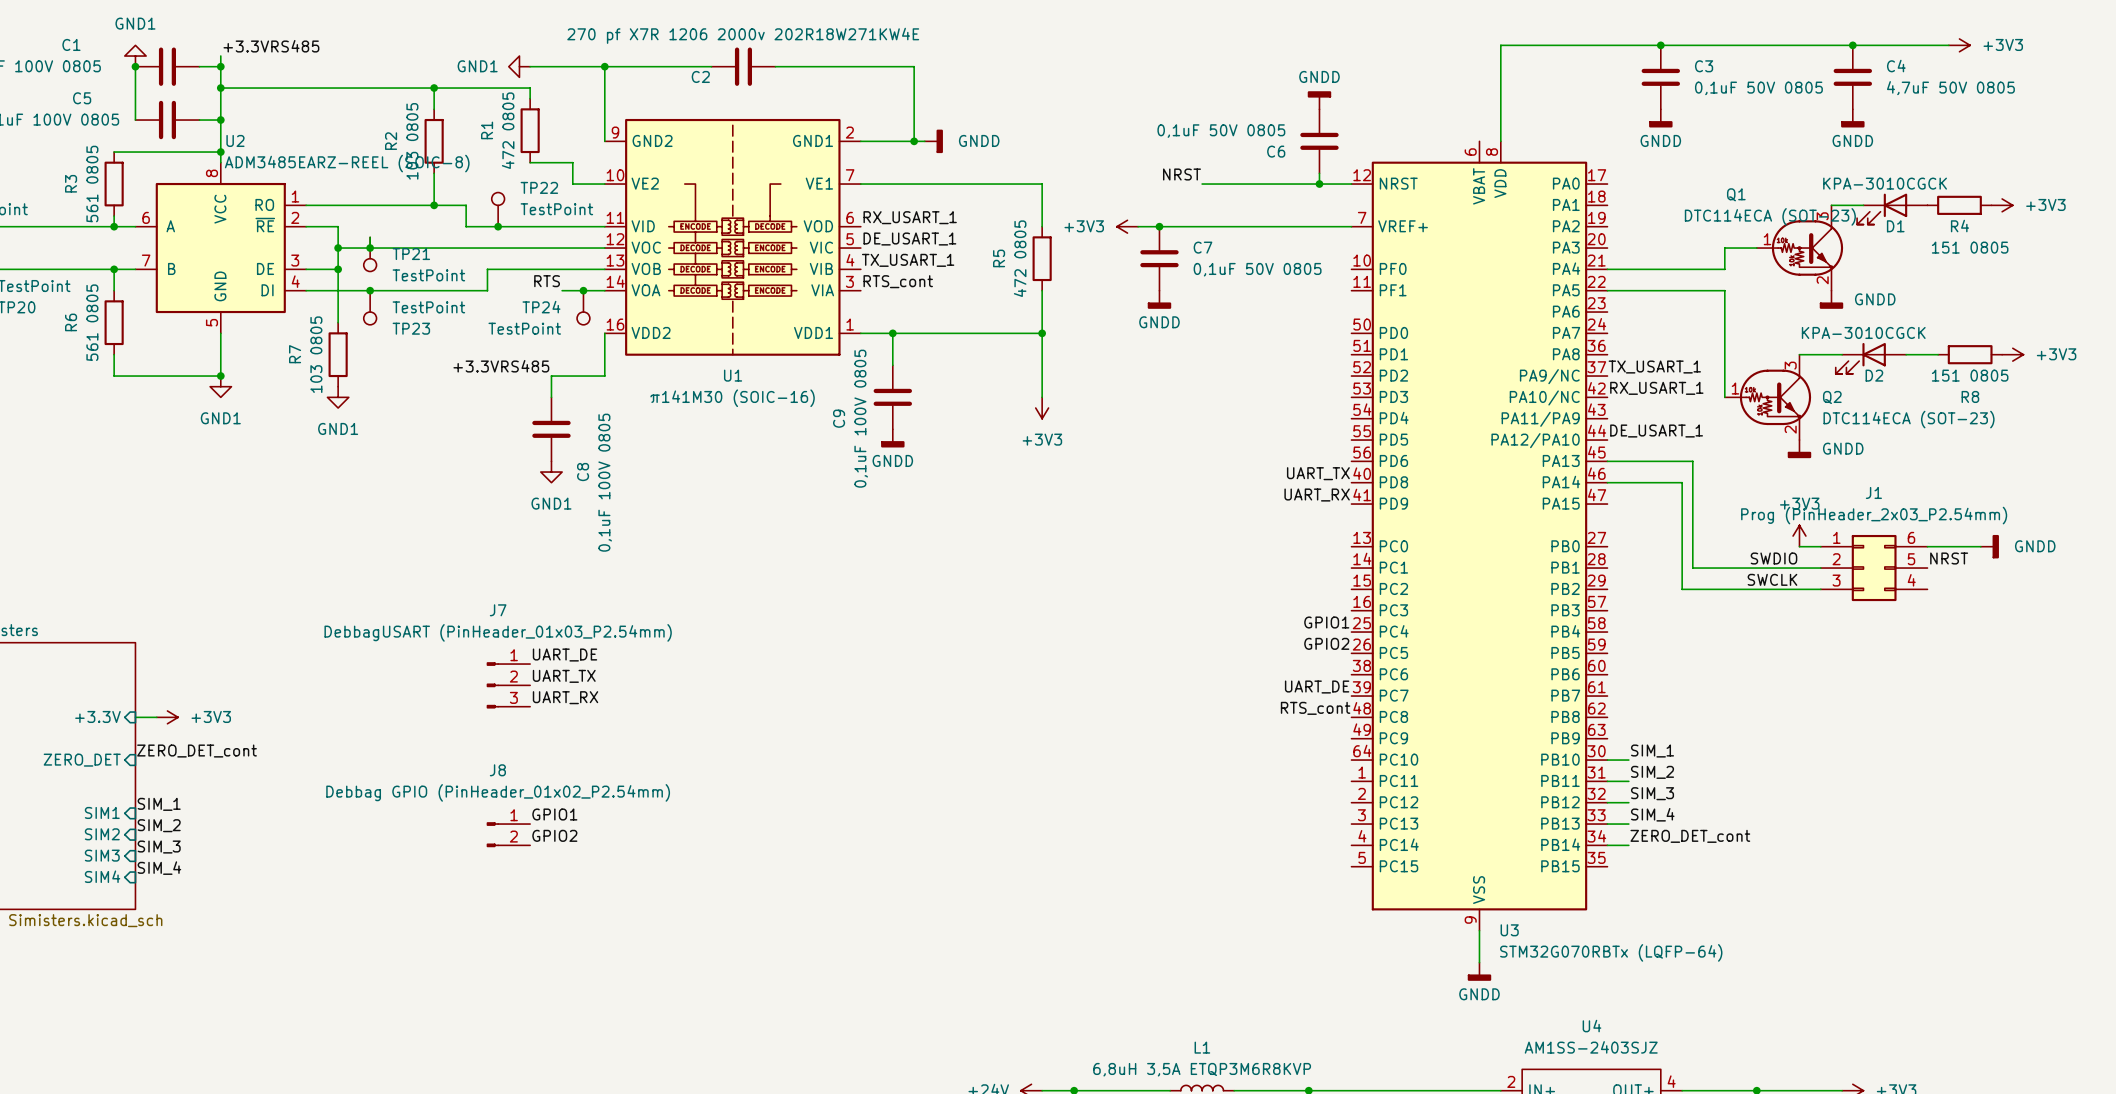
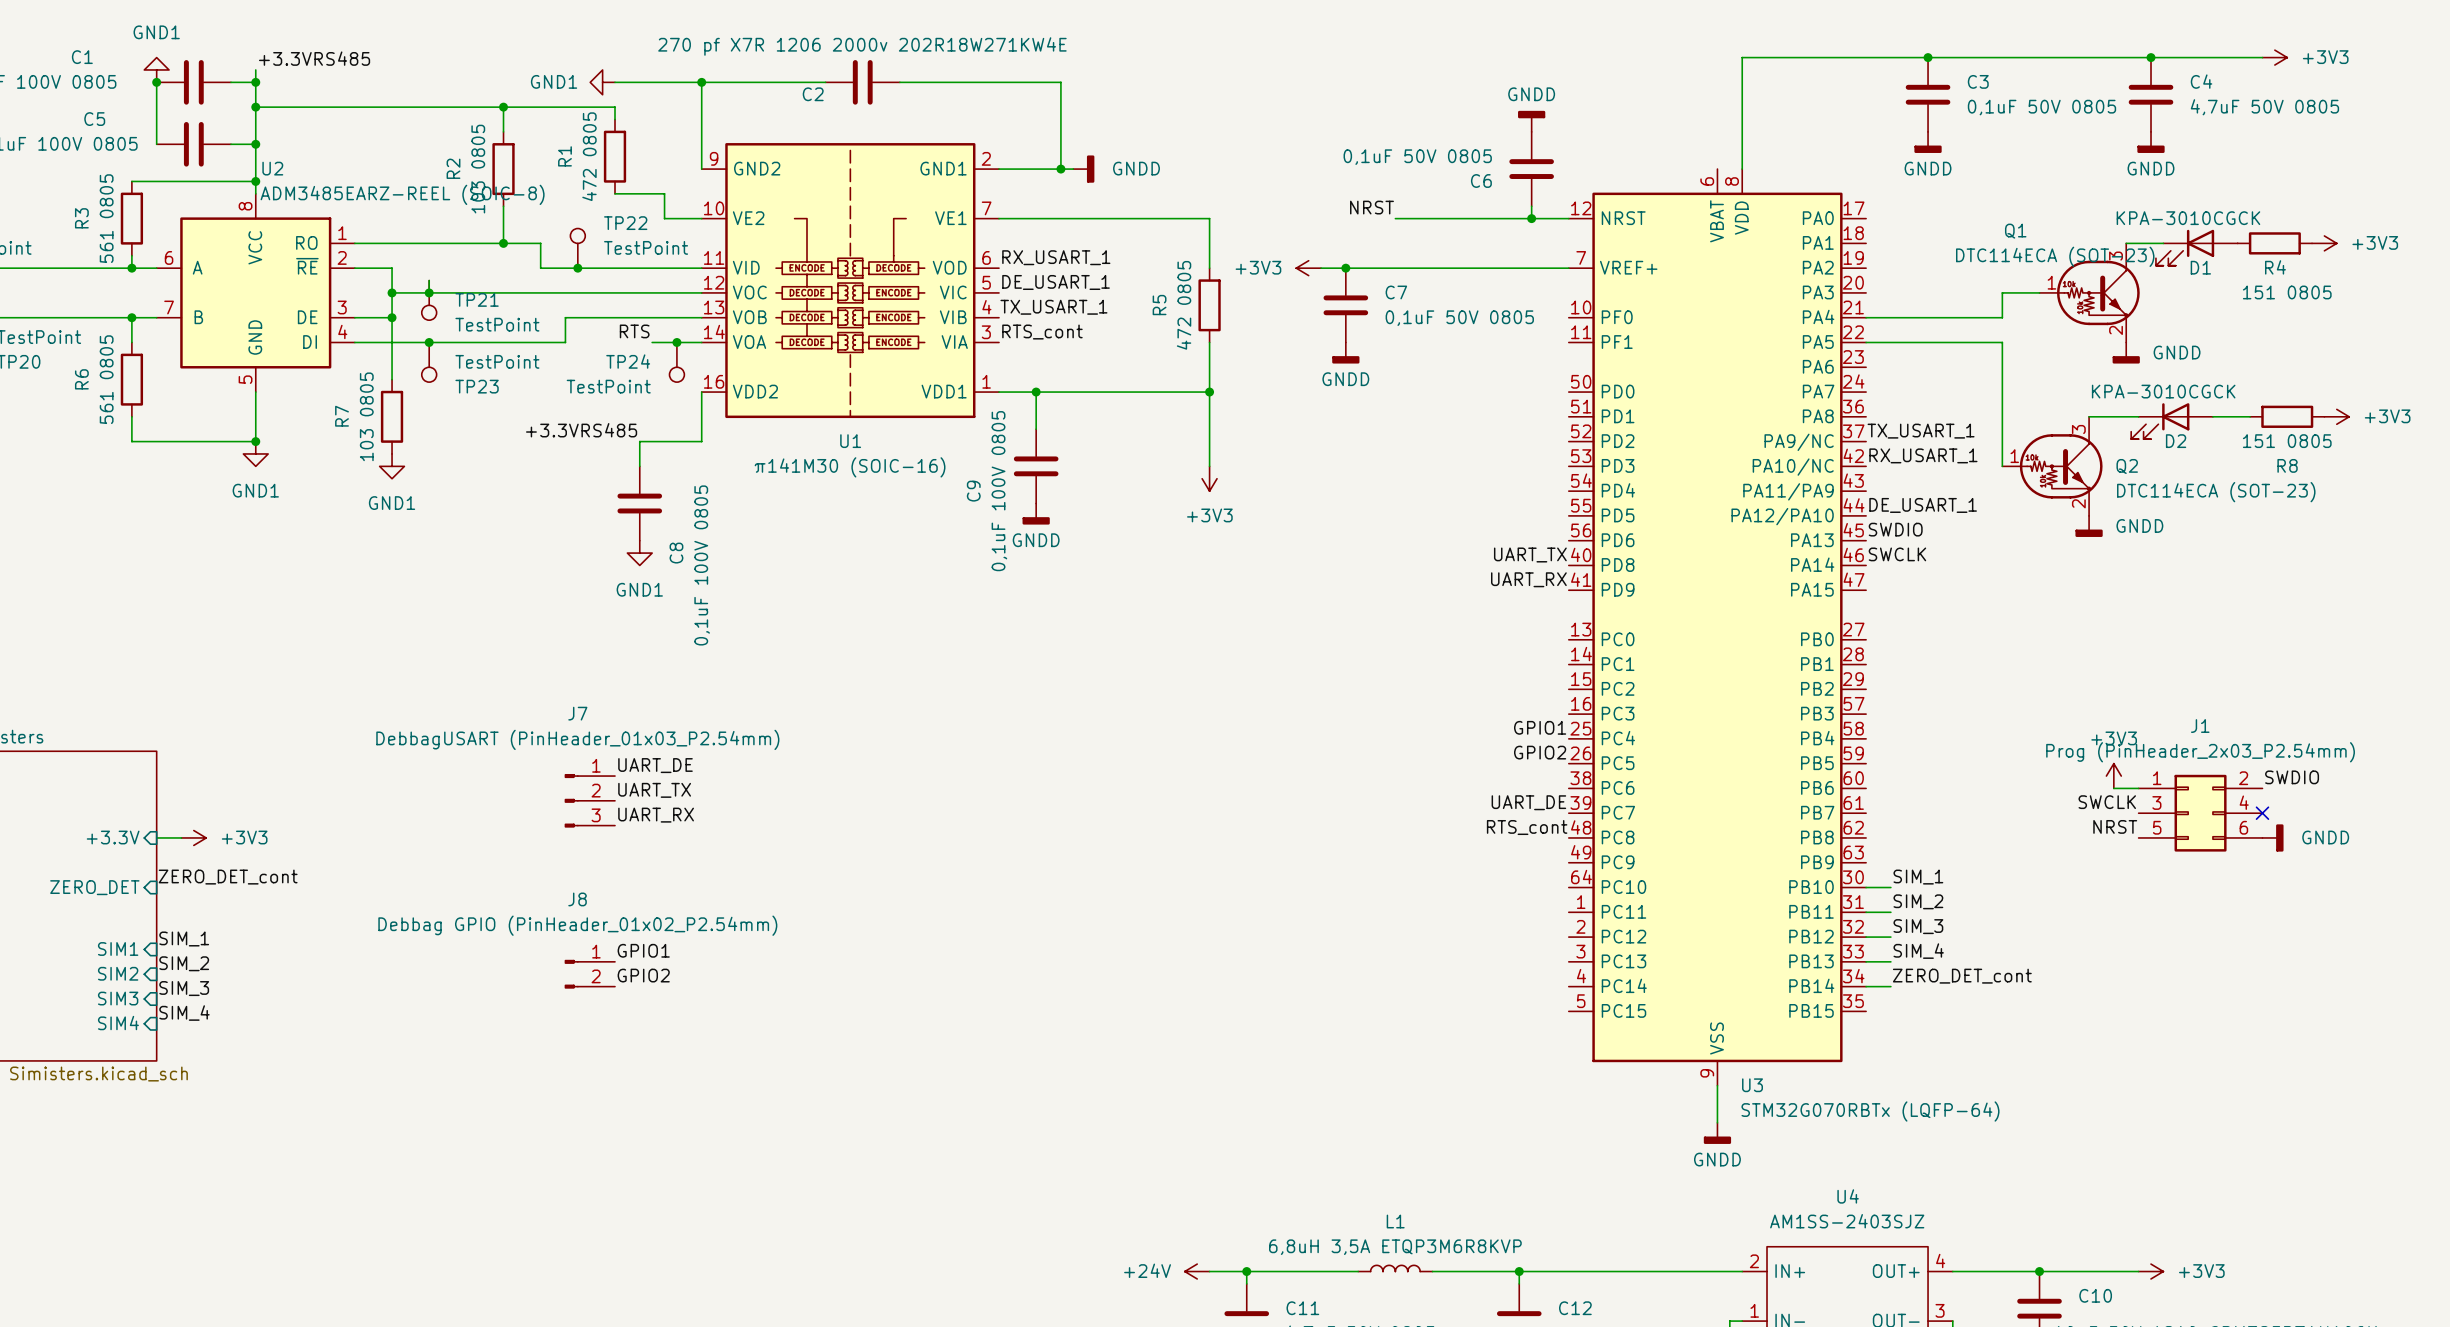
label: none -> SWDIO (1895, 529)
wire: (1607, 461) (1692, 461) (1692, 568) (1820, 568) -> none
label: none -> SWCLK (1897, 554)
wire: (1607, 482) (1682, 482) (1682, 589) (1820, 589) -> none
power symbol position: +3V3 (1799, 536) -> +3V3 (2113, 776)
J1 pin number: 6 (1911, 537) -> 2 (2243, 778)
wire: (1799, 546) (1820, 546) -> (2113, 788) (2138, 788)
wire: (1927, 546) (1980, 546) -> none
power symbol position: GNDD (1989, 546) -> GNDD (2273, 837)
label: SWDIO (1774, 558) -> none
label position: NRST (1949, 558) -> NRST (2115, 826)
J1 pin number: 2 (1836, 559) -> 3 (2156, 802)
J1 pin number: 5 (1911, 559) -> 4 (2244, 802)
J1 position: (1874, 568) -> (2200, 813)
label: SWCLK (1772, 579) -> none
J1 pin number: 3 (1836, 580) -> 5 (2157, 827)
J1 pin number: 4 (1911, 580) -> 6 (2243, 827)
label: none -> SWDIO (2292, 777)
label: none -> SWCLK (2107, 802)
no-connect mark: none -> (2262, 813)

